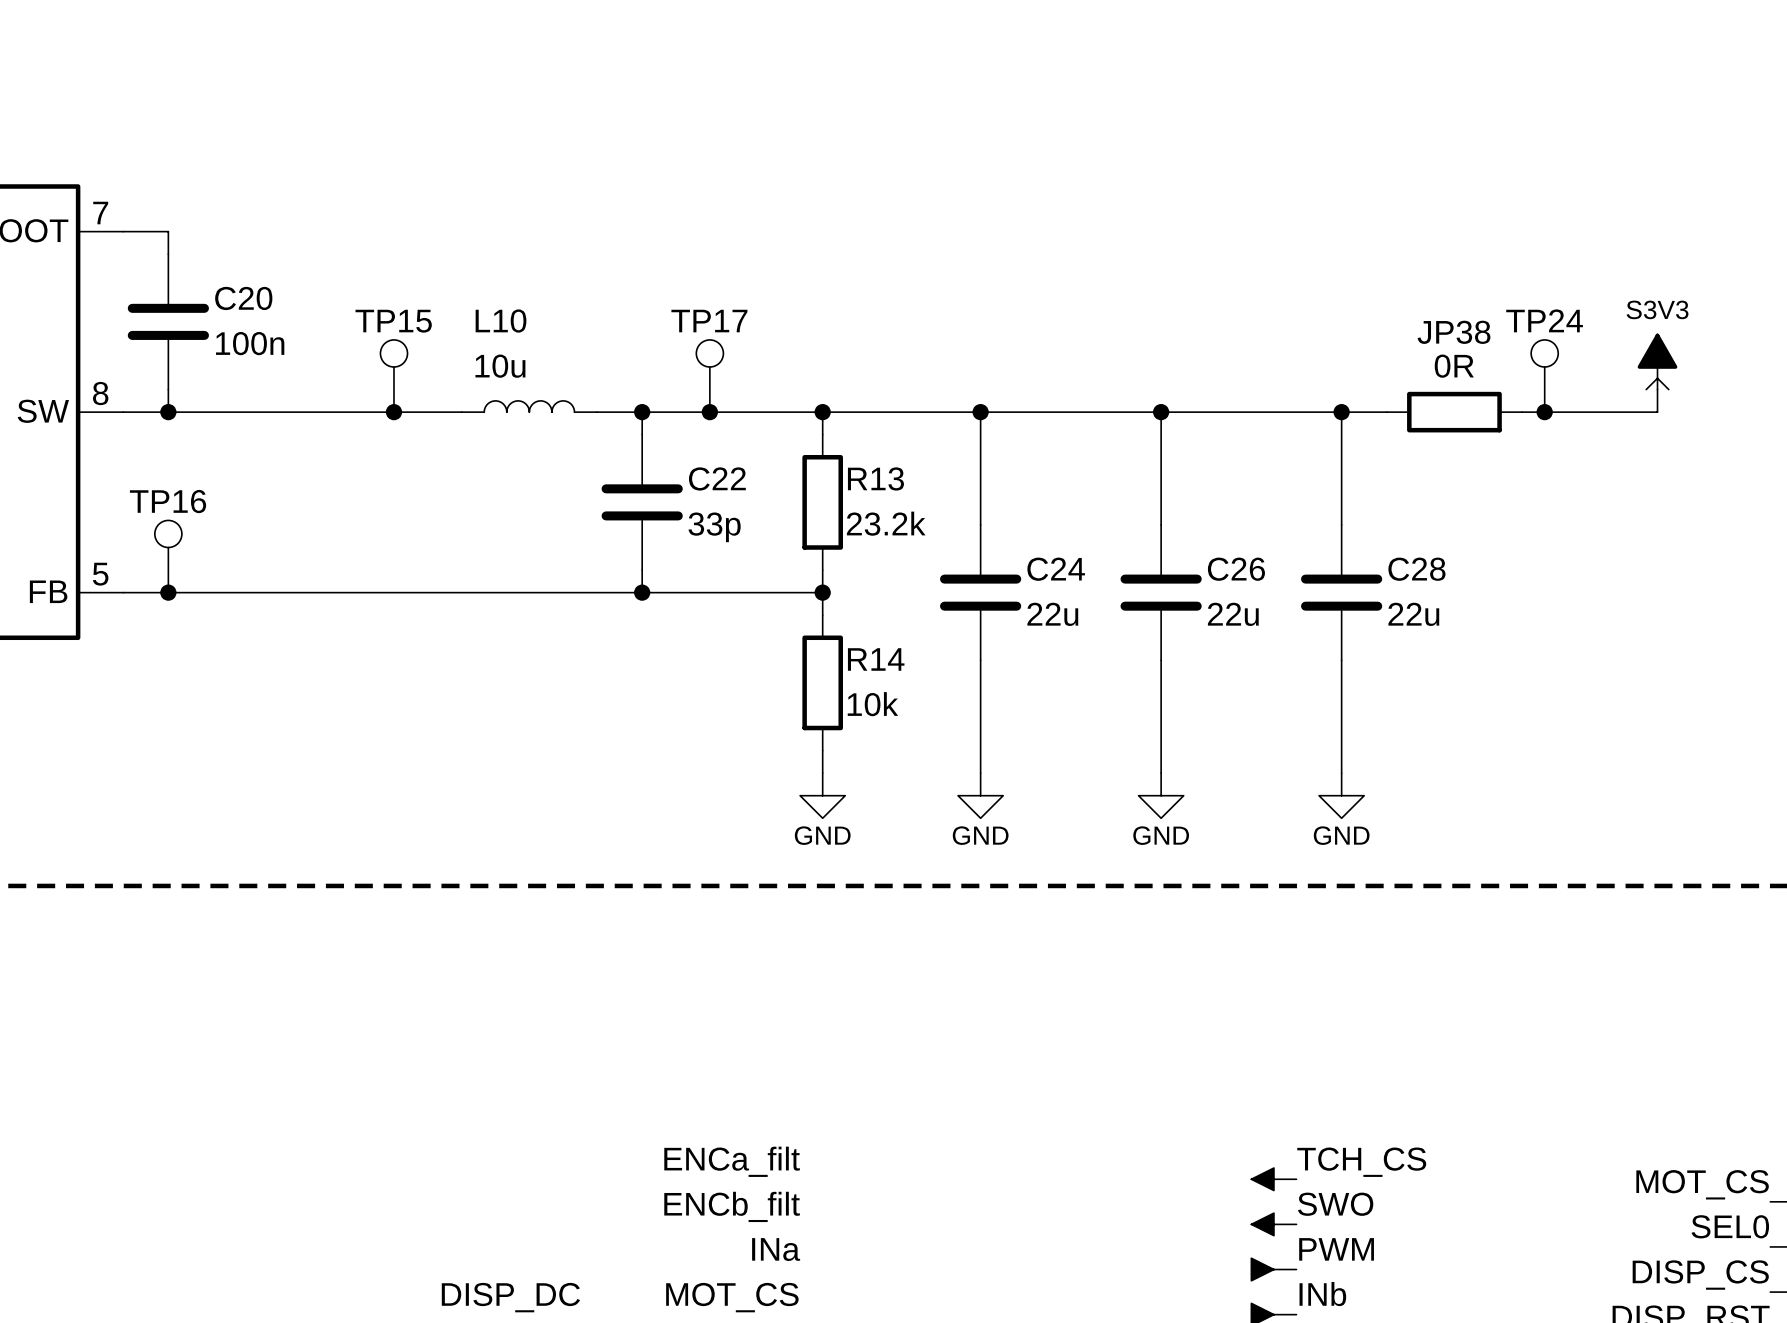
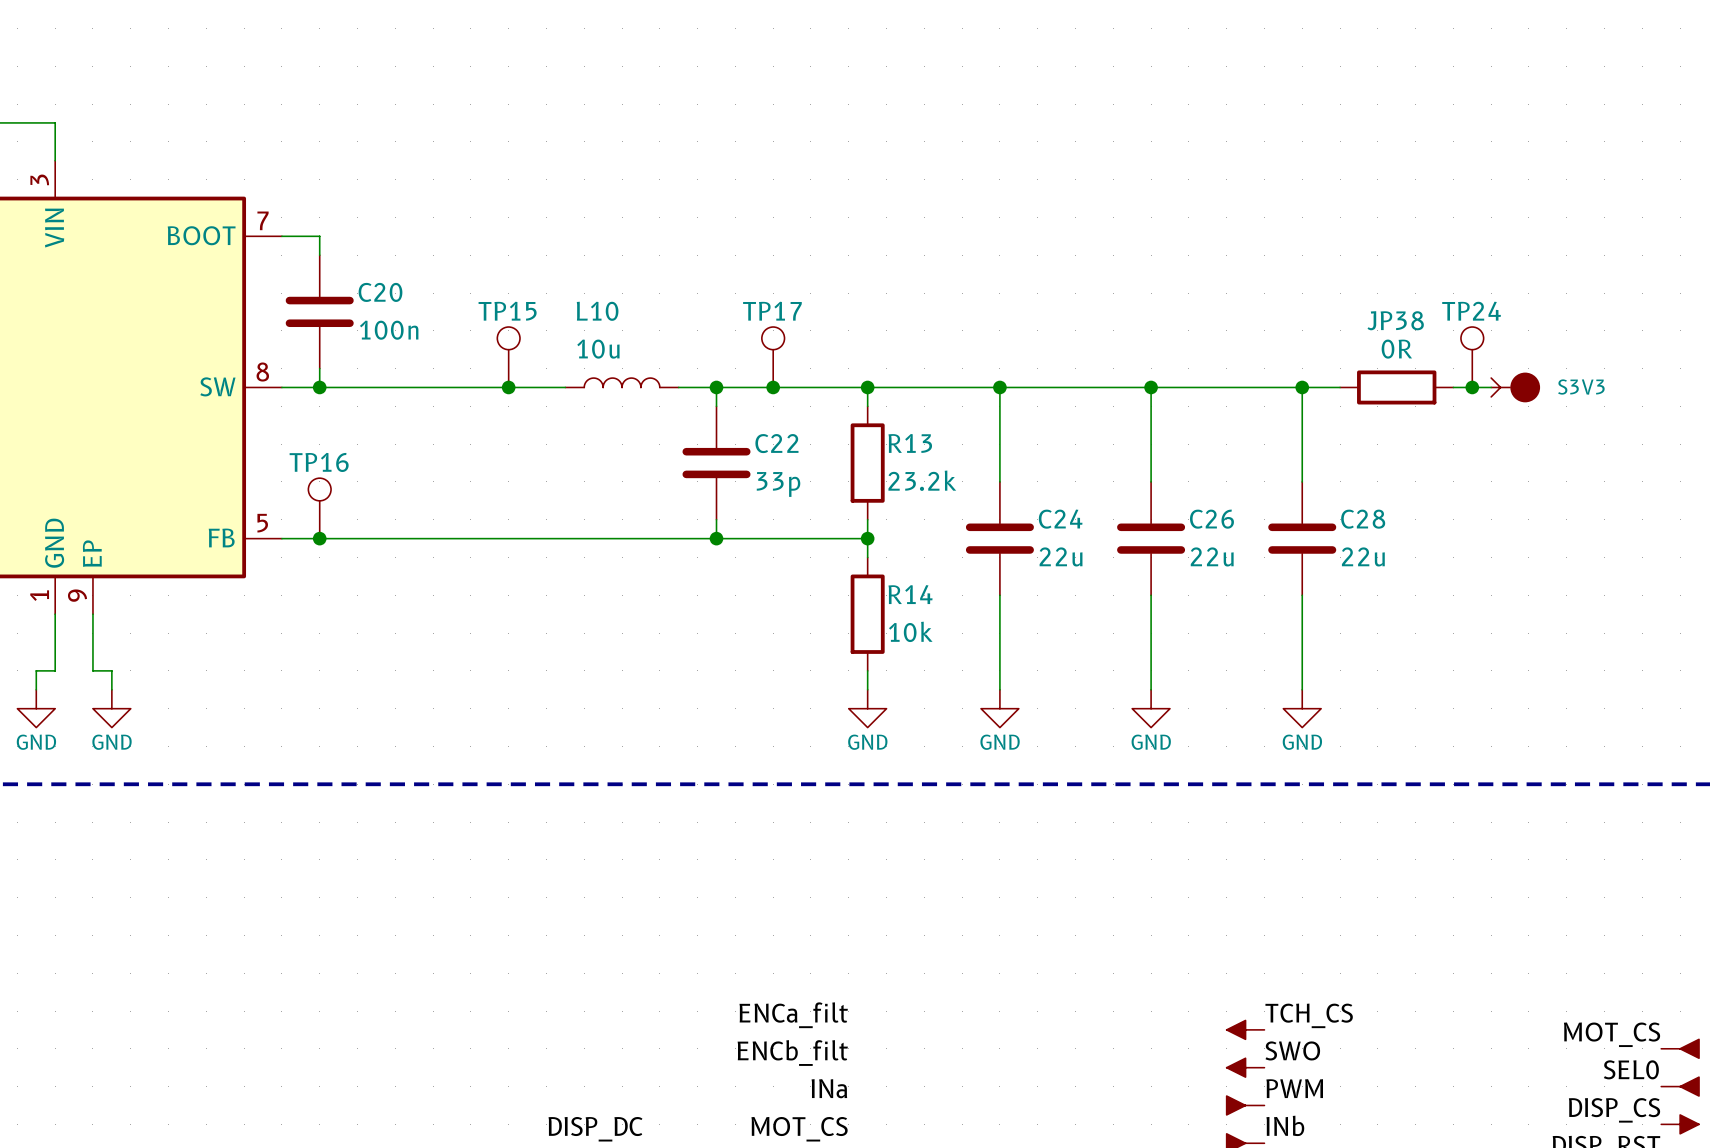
power symbol: S3V3 (1657, 361) -> none
wire: (1657, 389) (1657, 412) (1567, 412) -> none
power symbol: none -> S3V3 (1515, 387)

